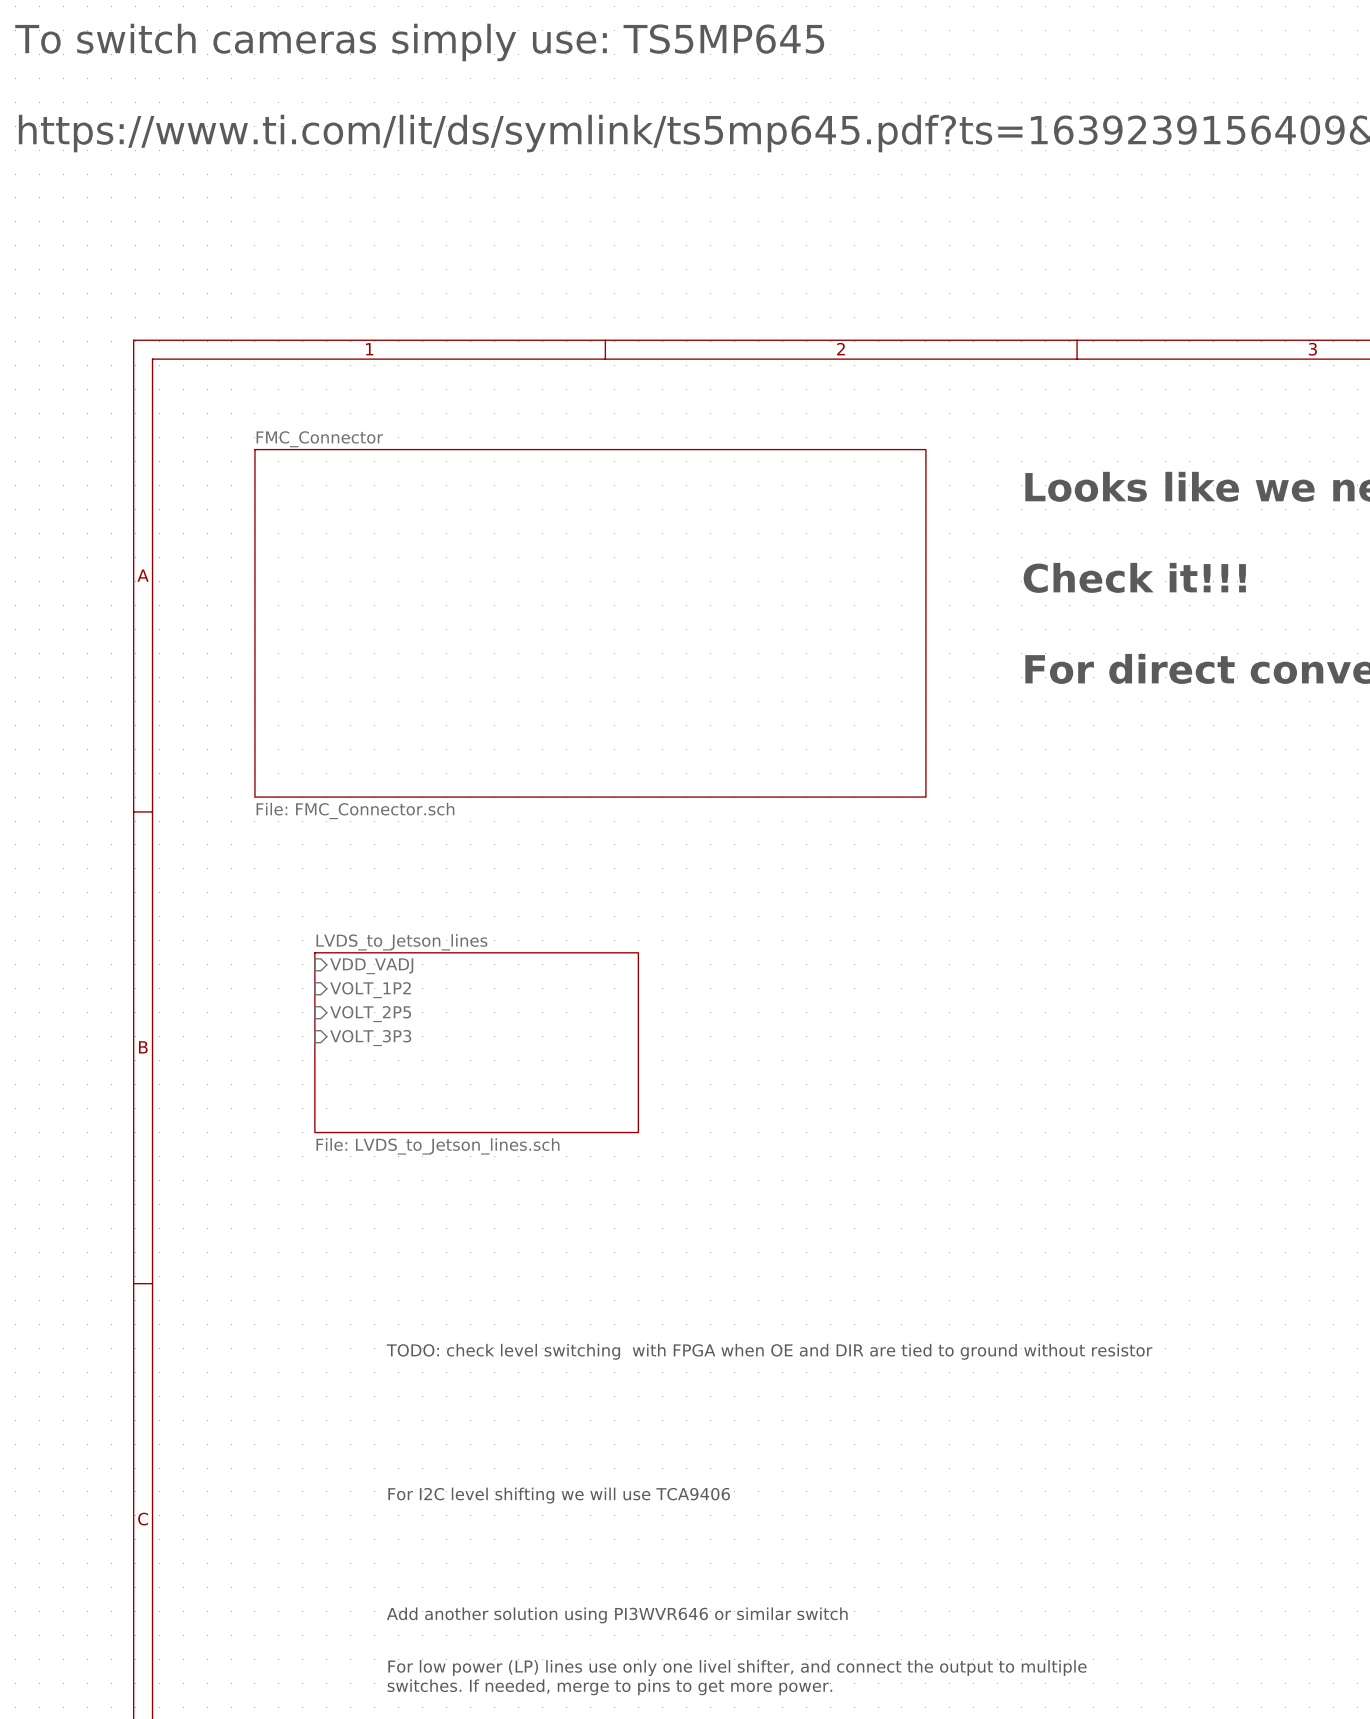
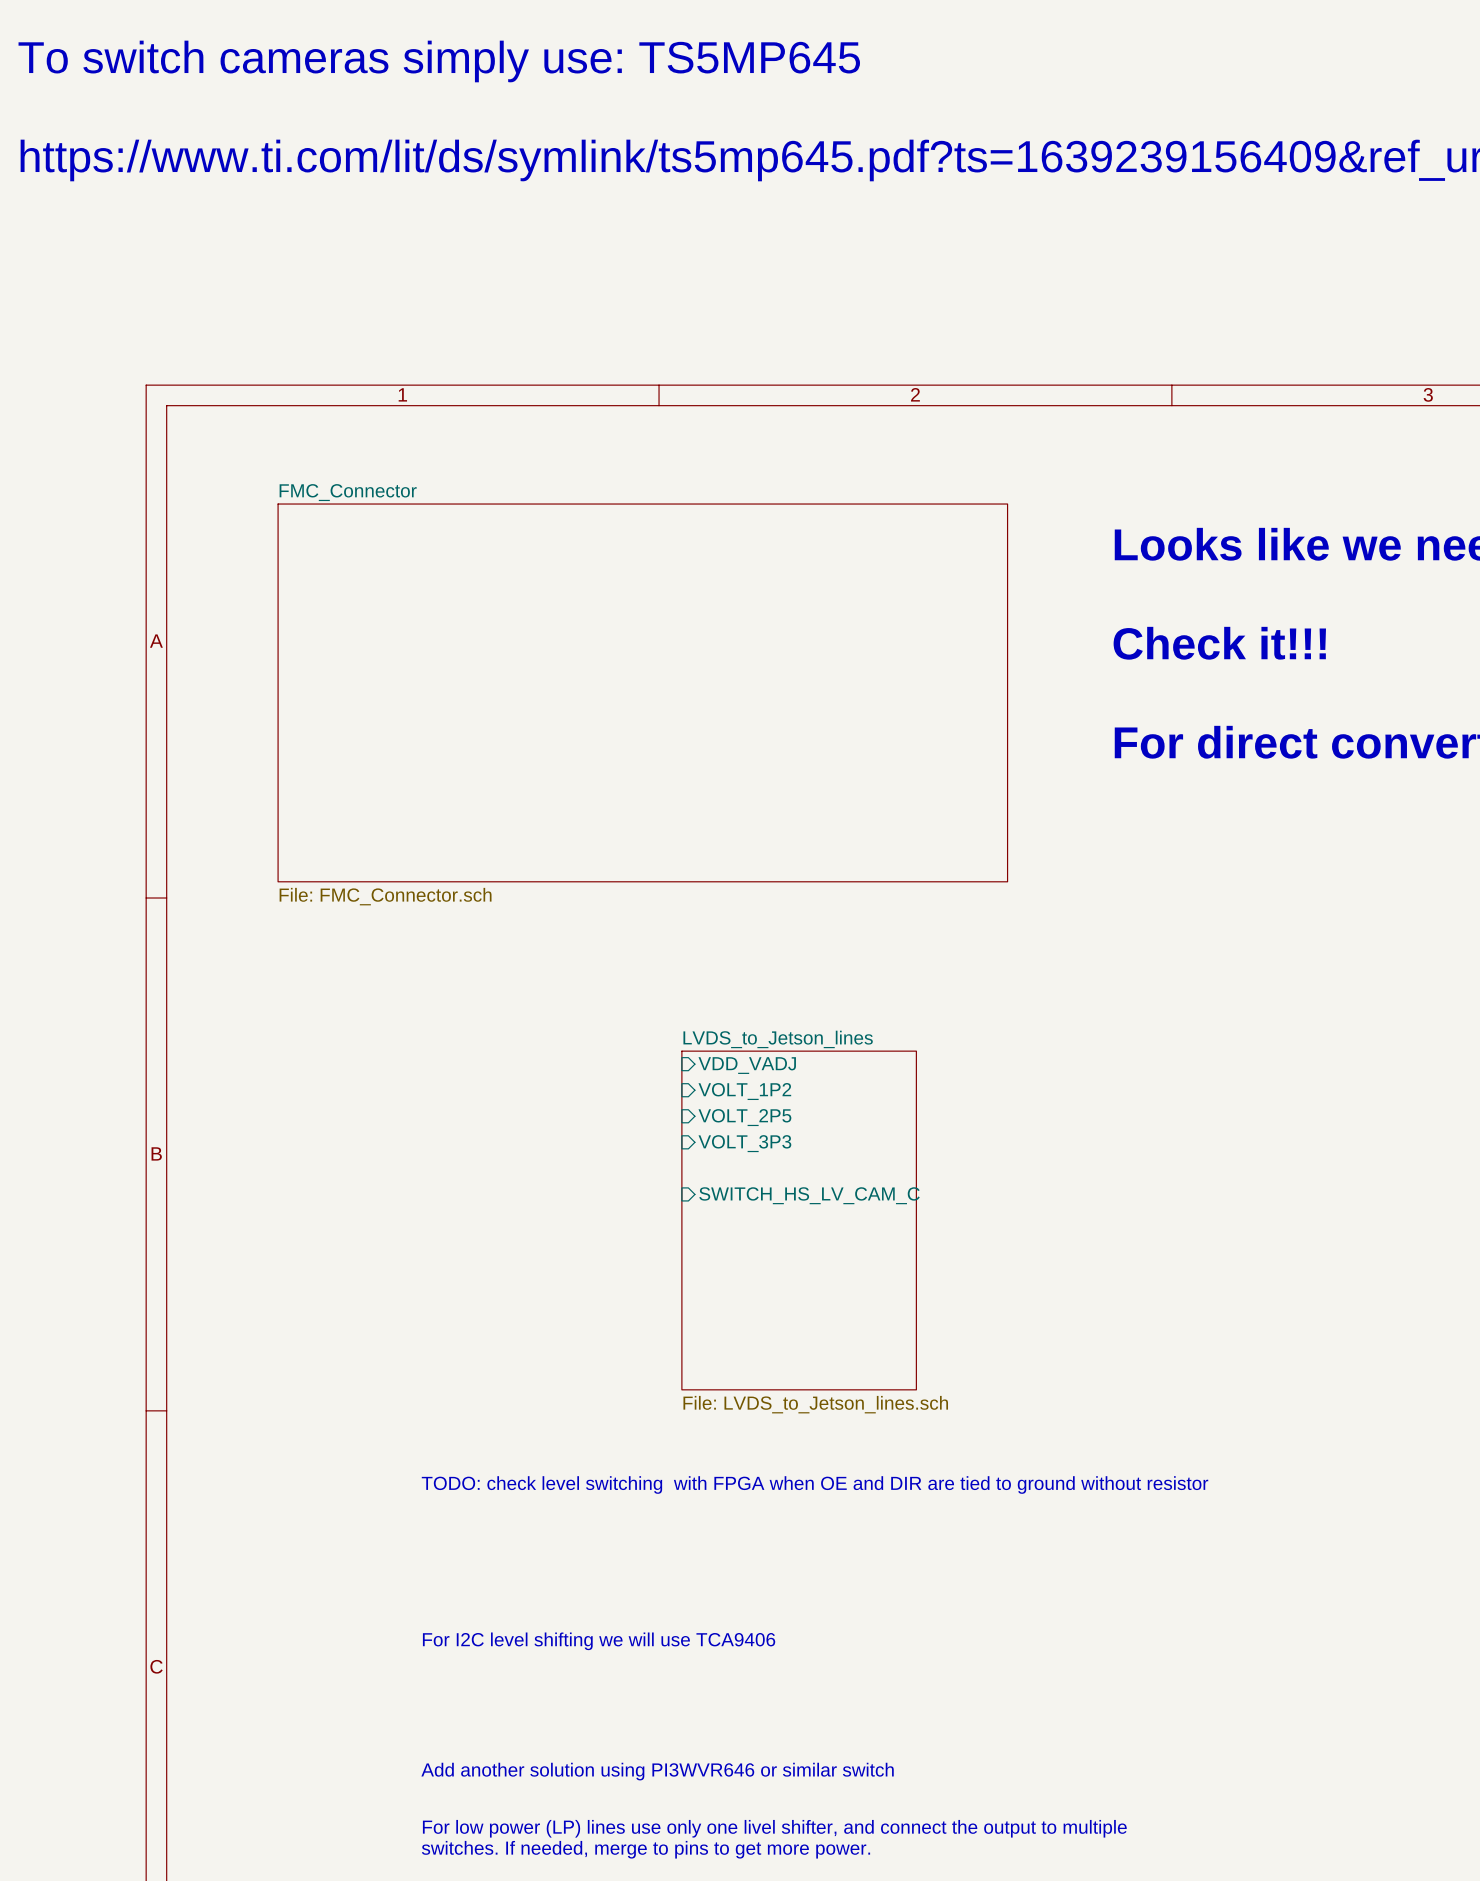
sheet pin: VDD_VADJ (371, 966) -> none
sheet pin: none -> VDD_VADJ (747, 1065)
sheet pin: VOLT_1P2 (370, 990) -> none
sheet pin: none -> VOLT_1P2 (744, 1091)
sheet pin: VOLT_2P5 (370, 1014) -> none
sheet pin: none -> VOLT_2P5 (744, 1117)
sheet pin: VOLT_3P3 (370, 1038) -> none
sheet pin: none -> VOLT_3P3 (744, 1143)
sheet LVDS_to_Jetson_lines: File: LVDS_to_Jetson_lines.sch (476, 1042) -> none
sheet pin: none -> SWITCH_HS_LV_CAM_C (809, 1195)
sheet LVDS_to_Jetson_lines: none -> File: LVDS_to_Jetson_lines.sch (799, 1220)

